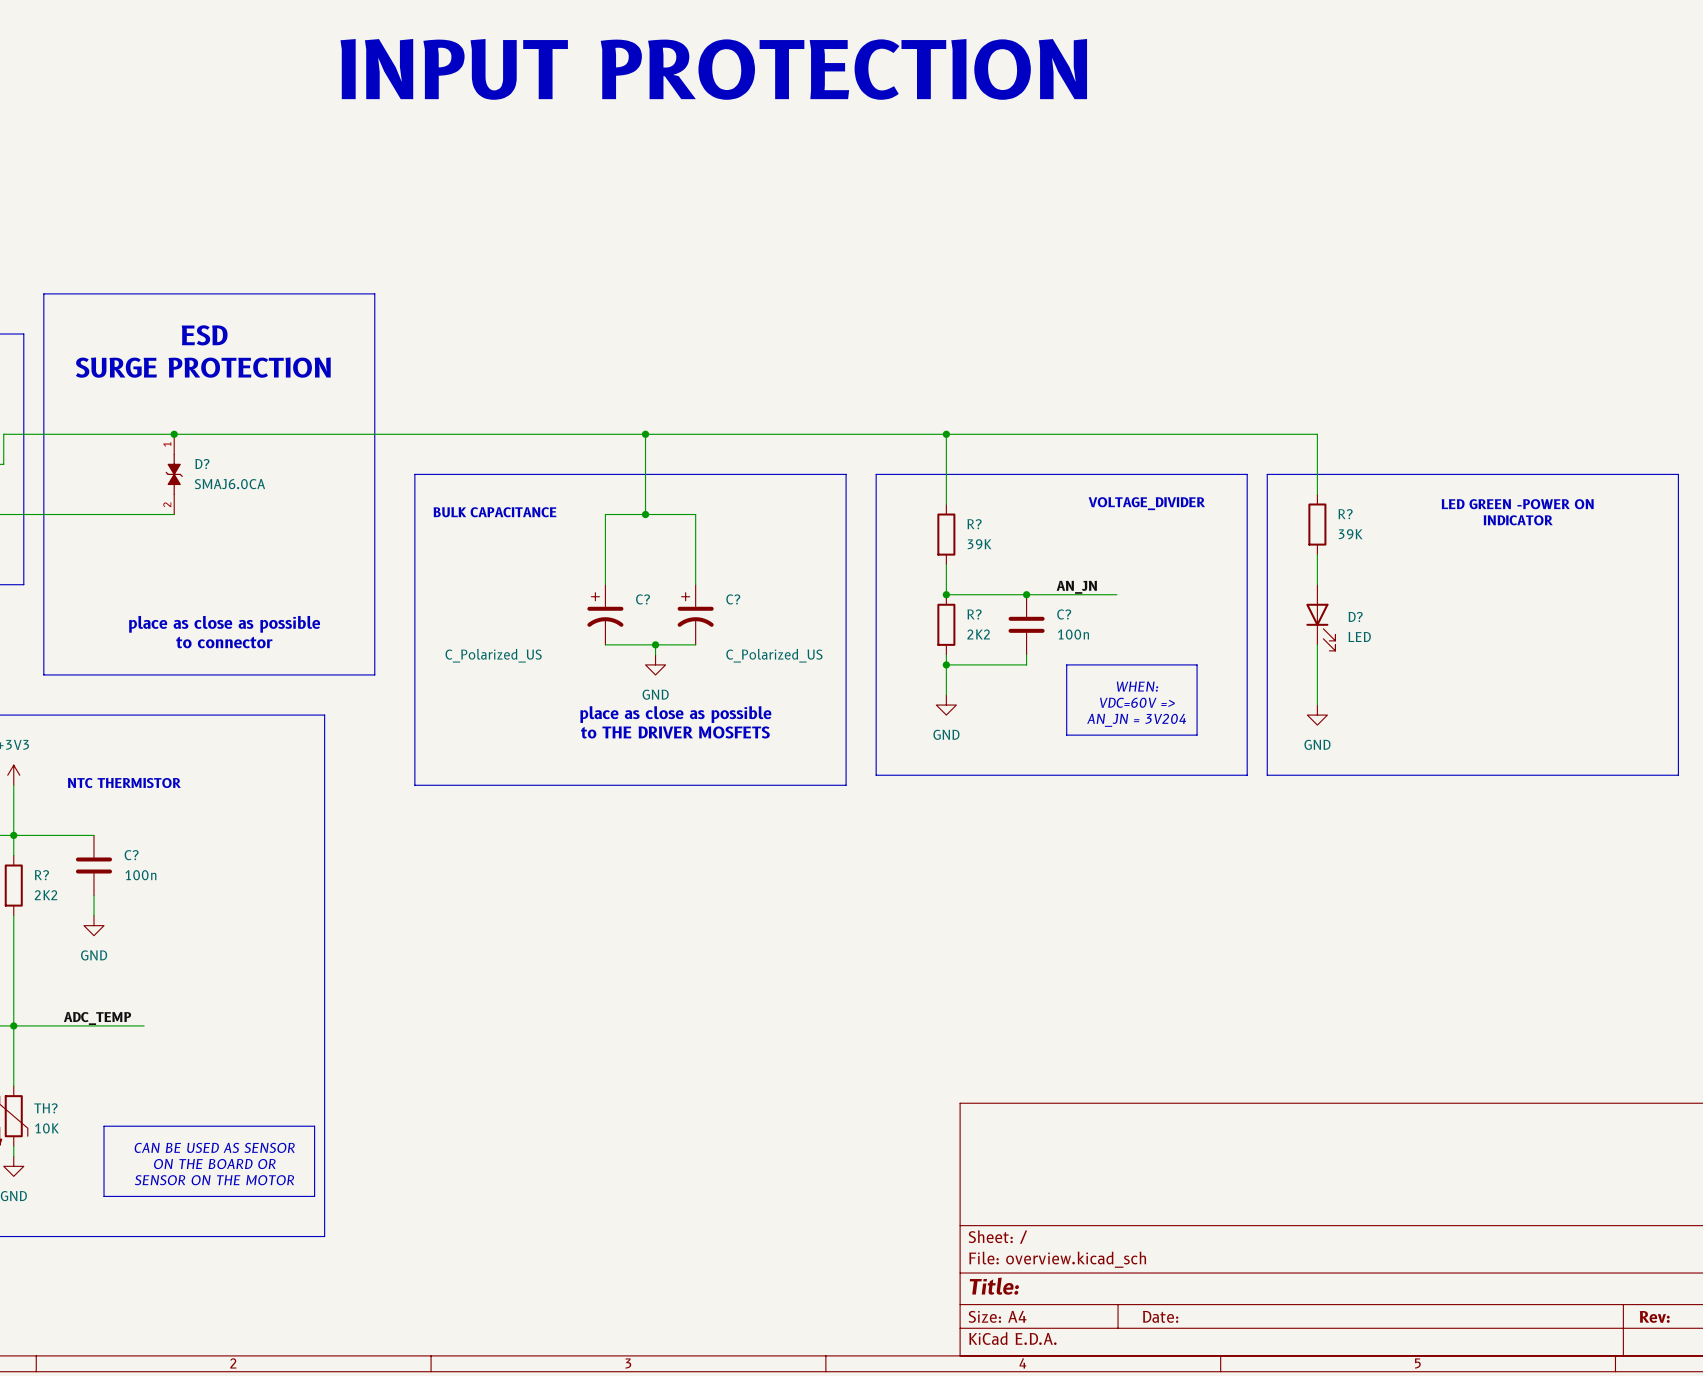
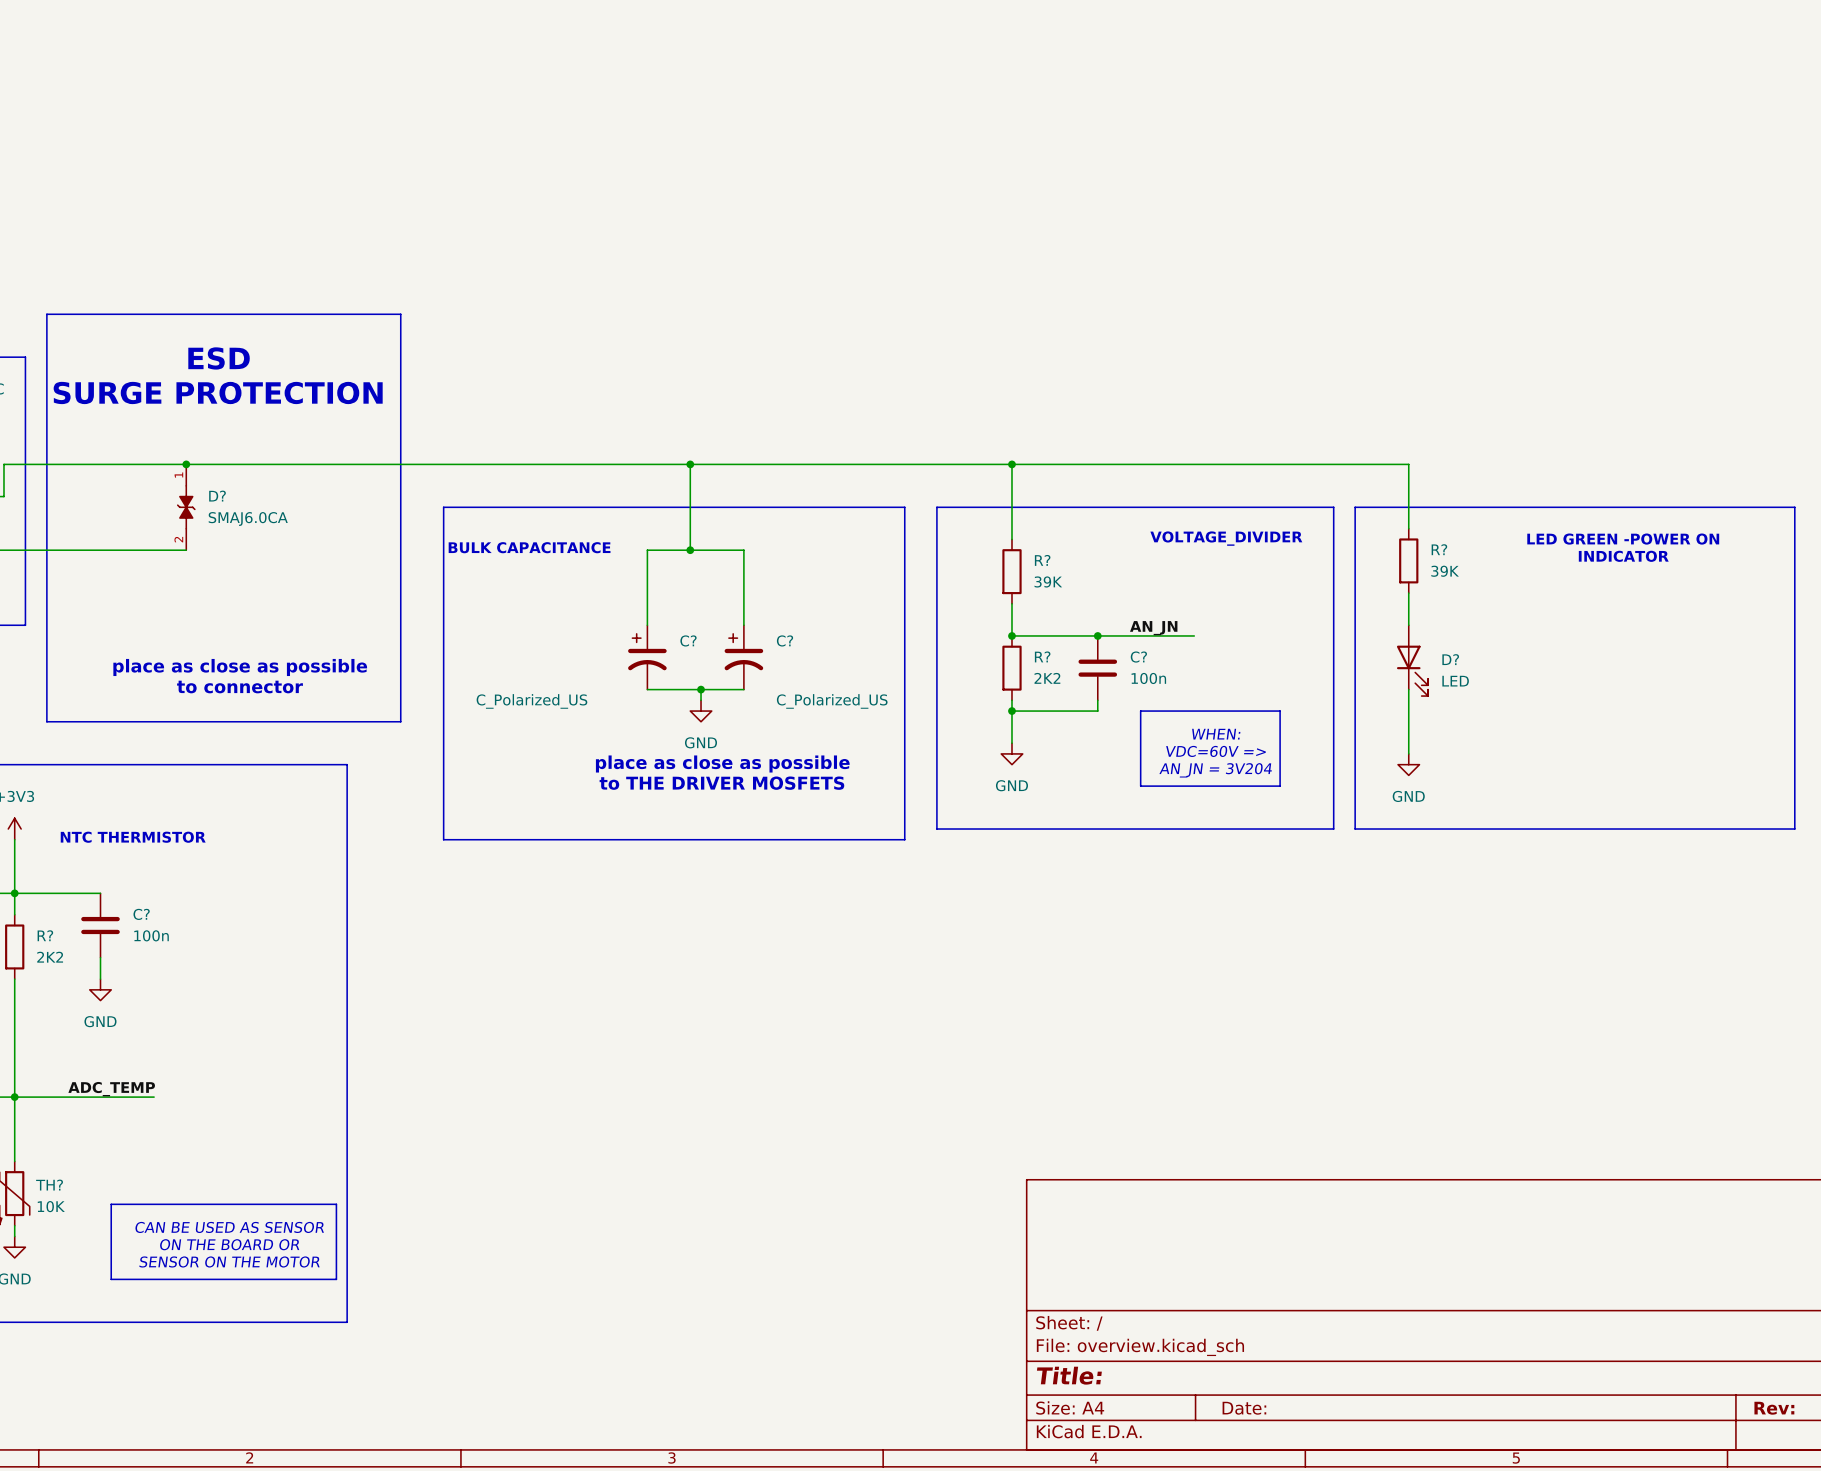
text: INPUT PROTECTION (713, 69) -> none

